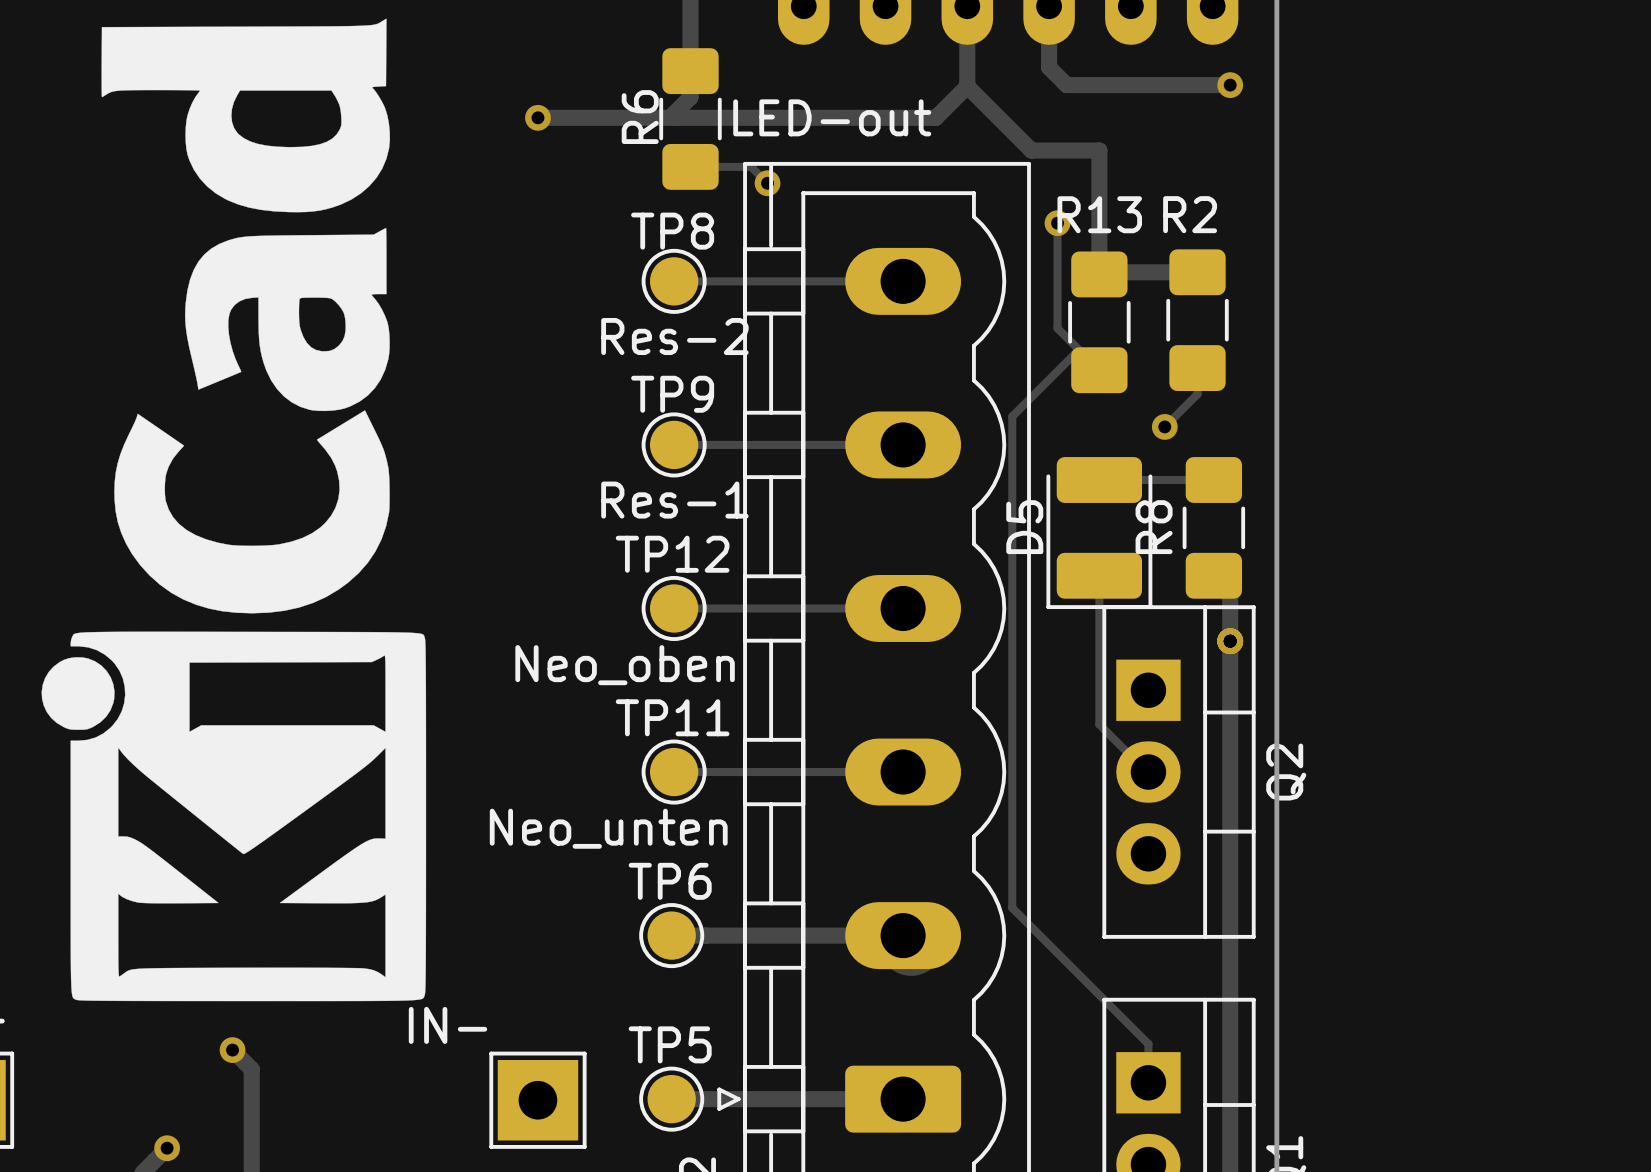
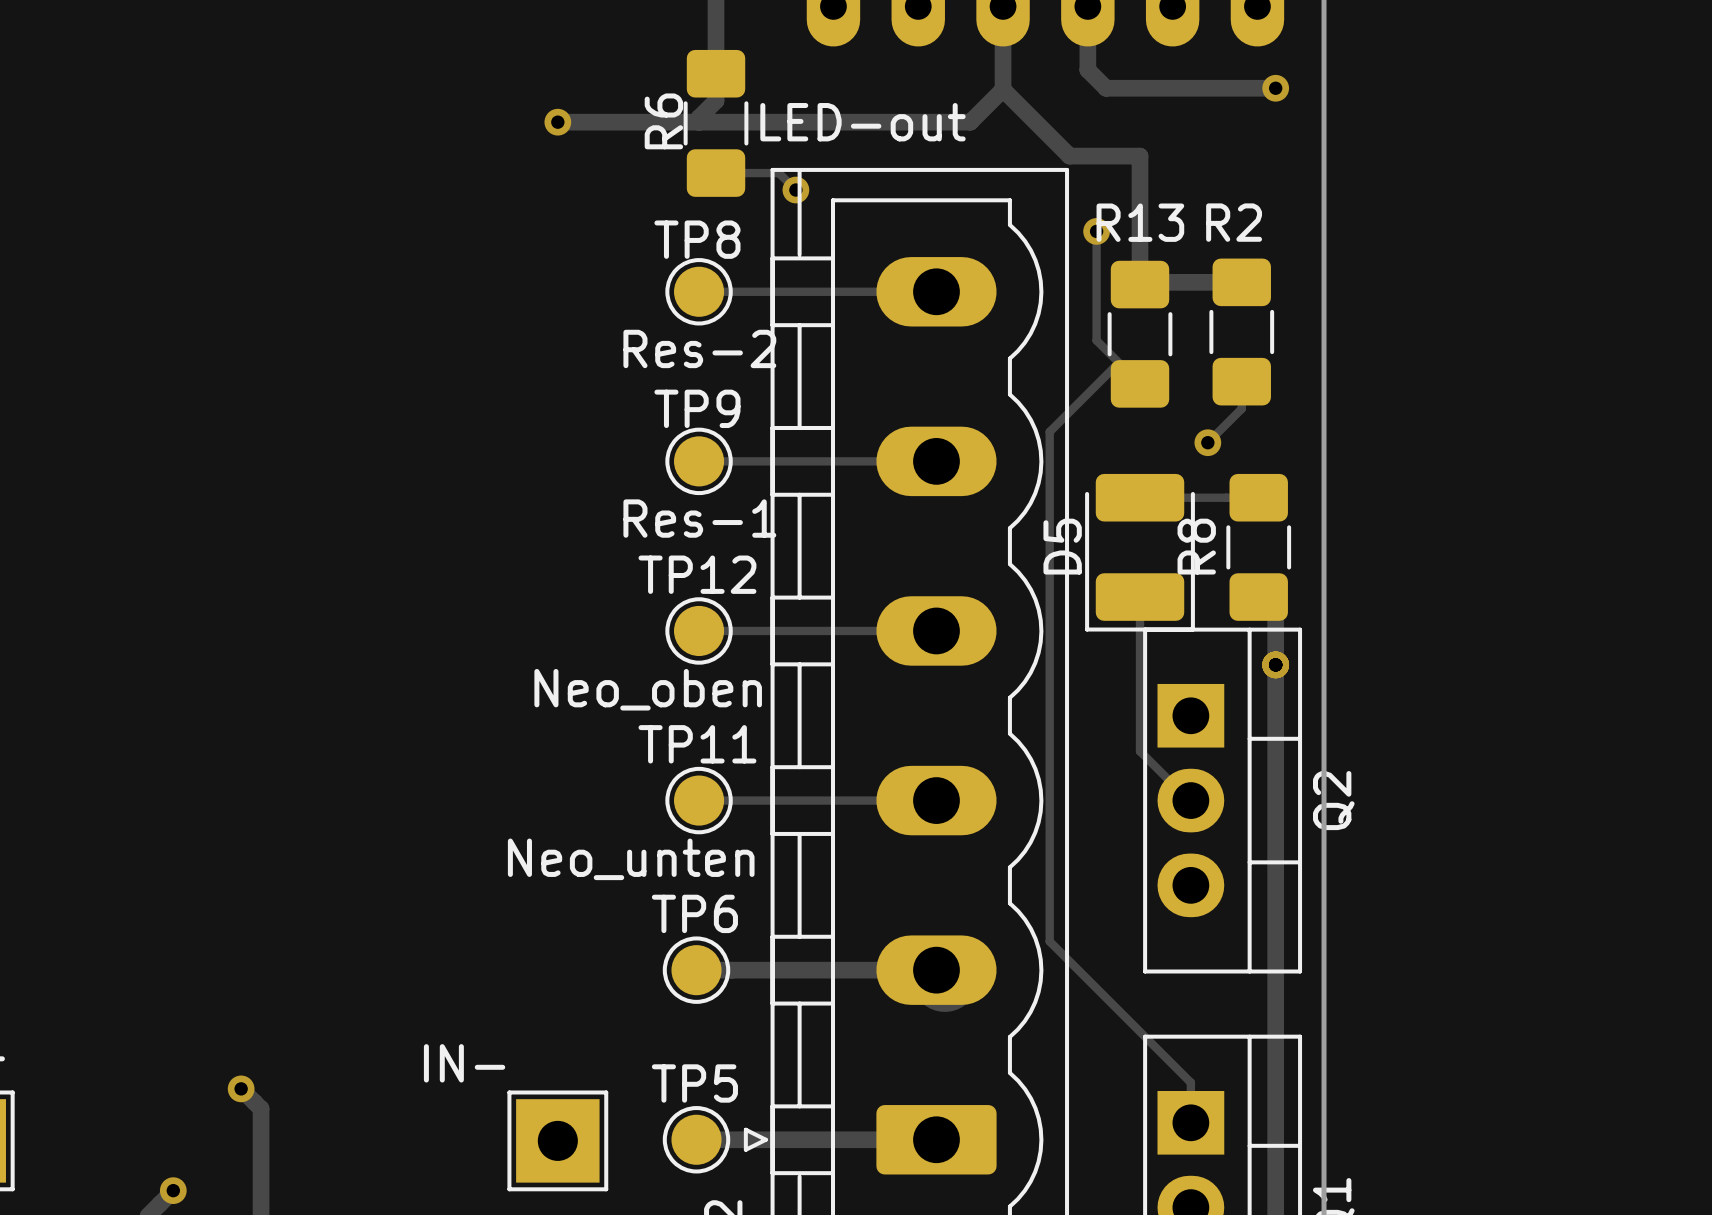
drawing: [41, 18, 427, 1002] -> none

